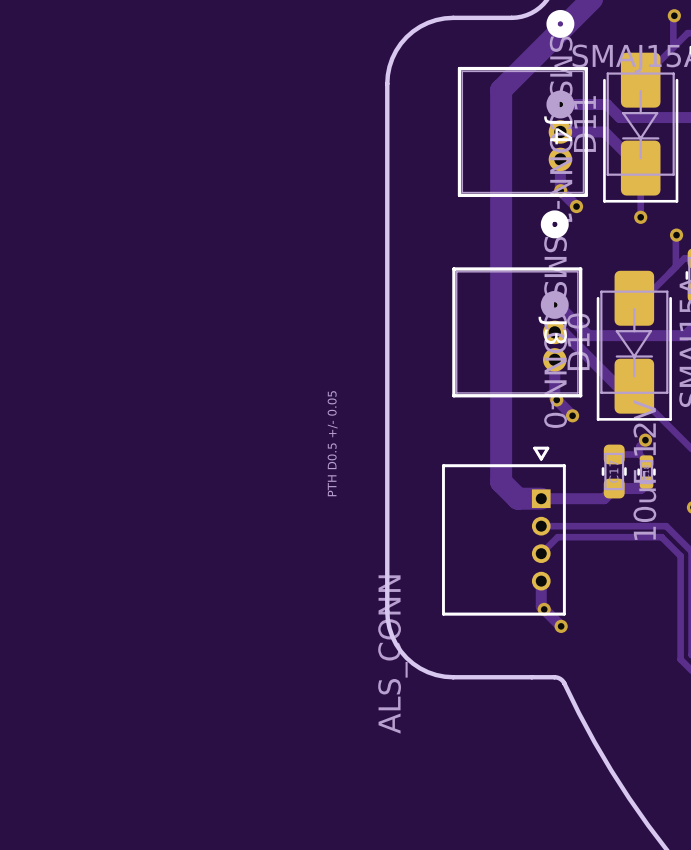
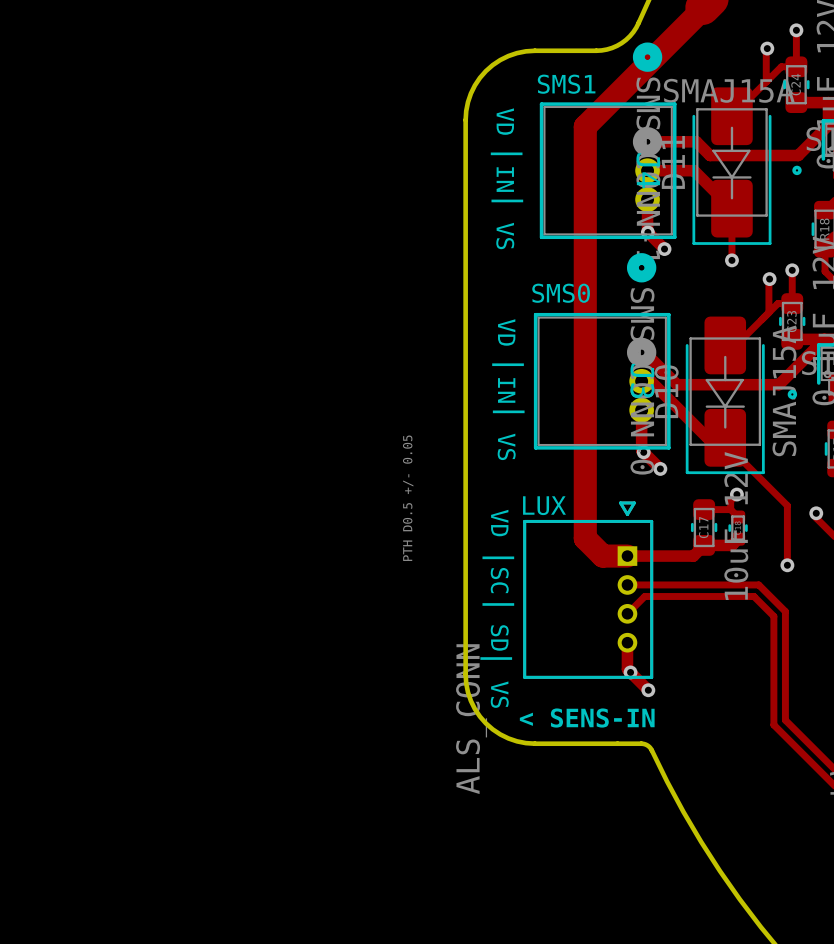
text: none -> SMS1 (566, 84)
text: none -> | (506, 153)
text: none -> VD IN VS (505, 178)
text: none -> | (507, 200)
text: none -> SMS0 (561, 293)
text: none -> | (508, 364)
text: none -> VD IN VS (506, 389)
text: none -> | (508, 411)
text: none -> LUX (544, 505)
text: none -> | (498, 557)
text: none -> VD SC SD VS (499, 608)
text: none -> | (498, 604)
text: none -> | (496, 658)
text: none -> < SENS-IN (587, 718)

